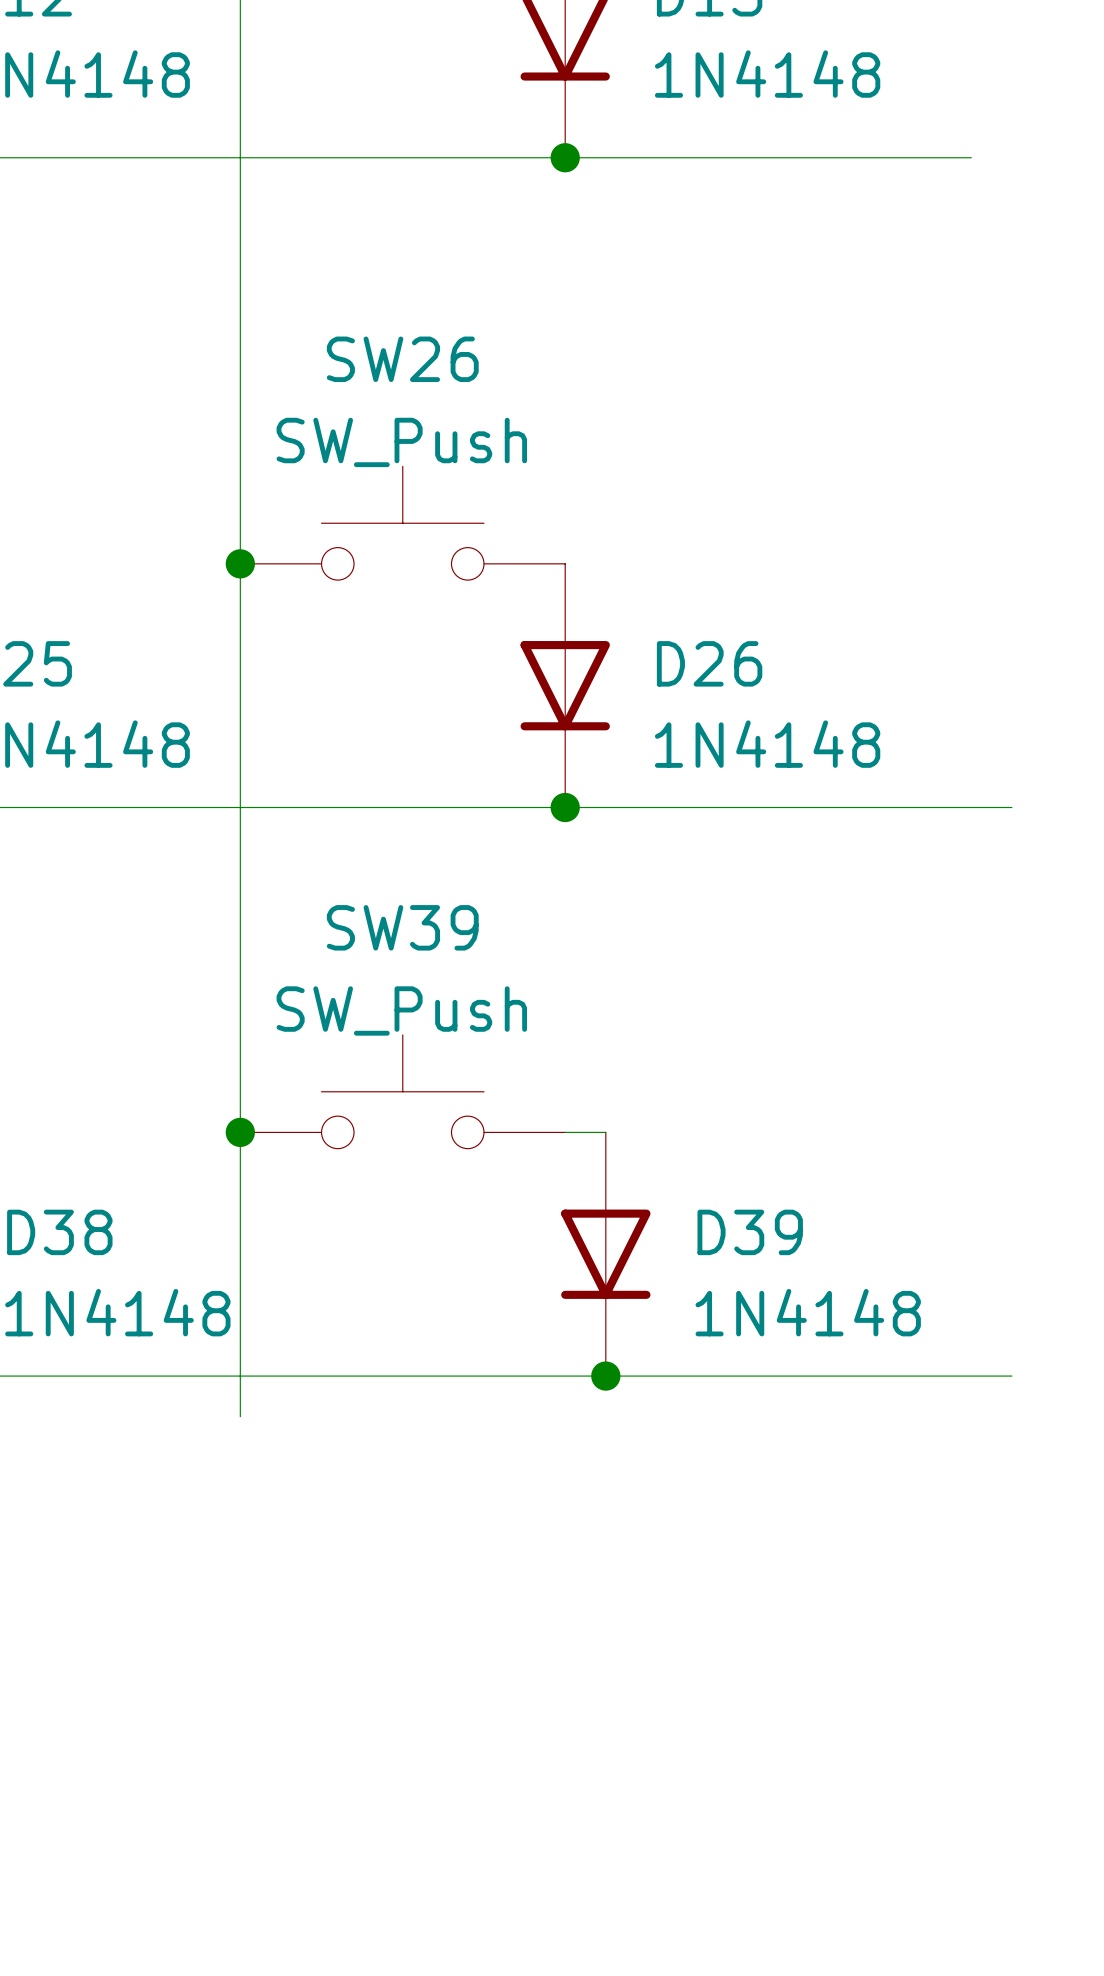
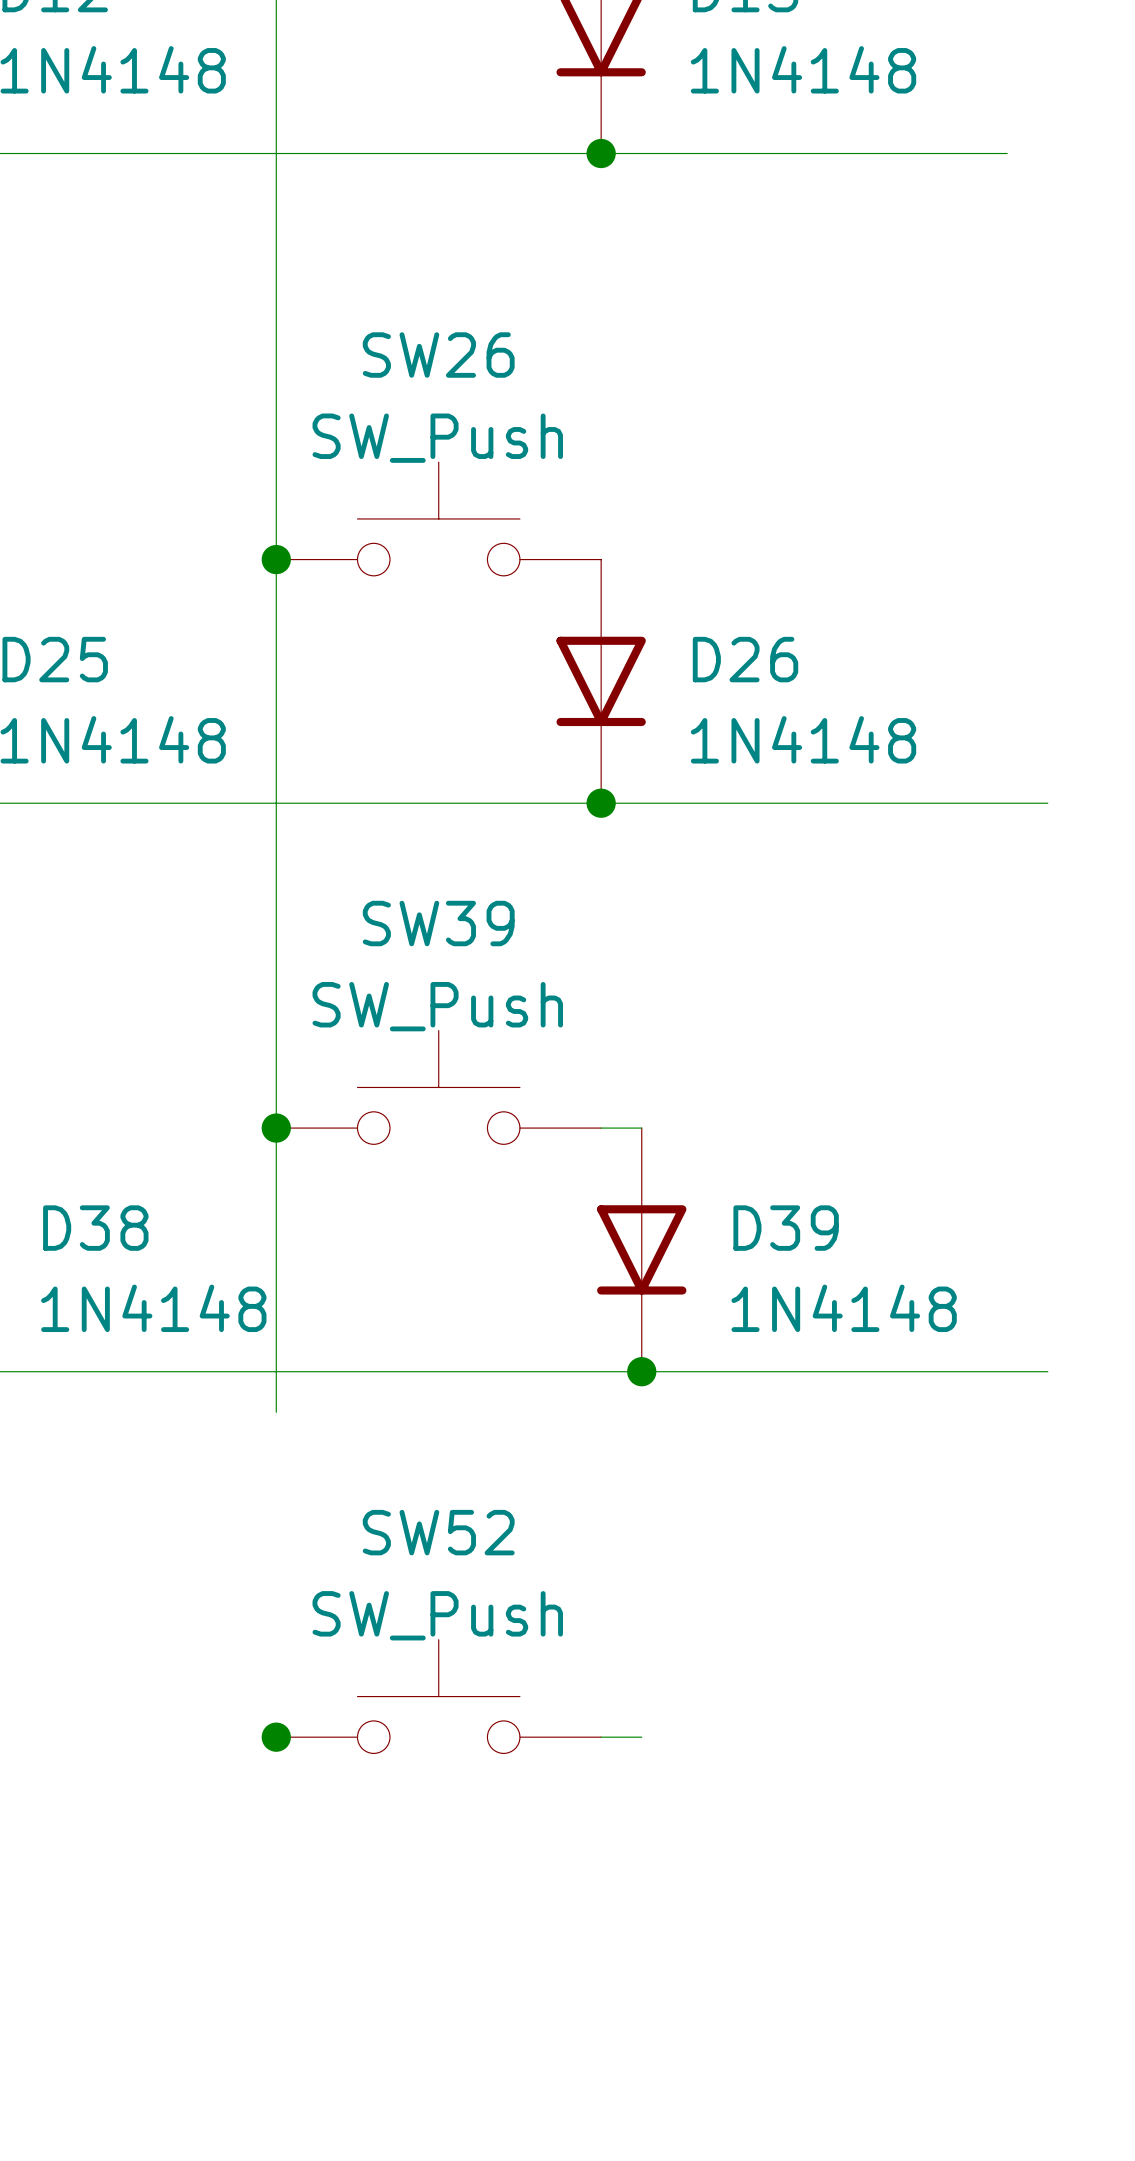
SW52: none -> SW_Push (438, 1696)
junction: none -> (276, 1737)
wire: none -> (601, 1737) (641, 1737)

